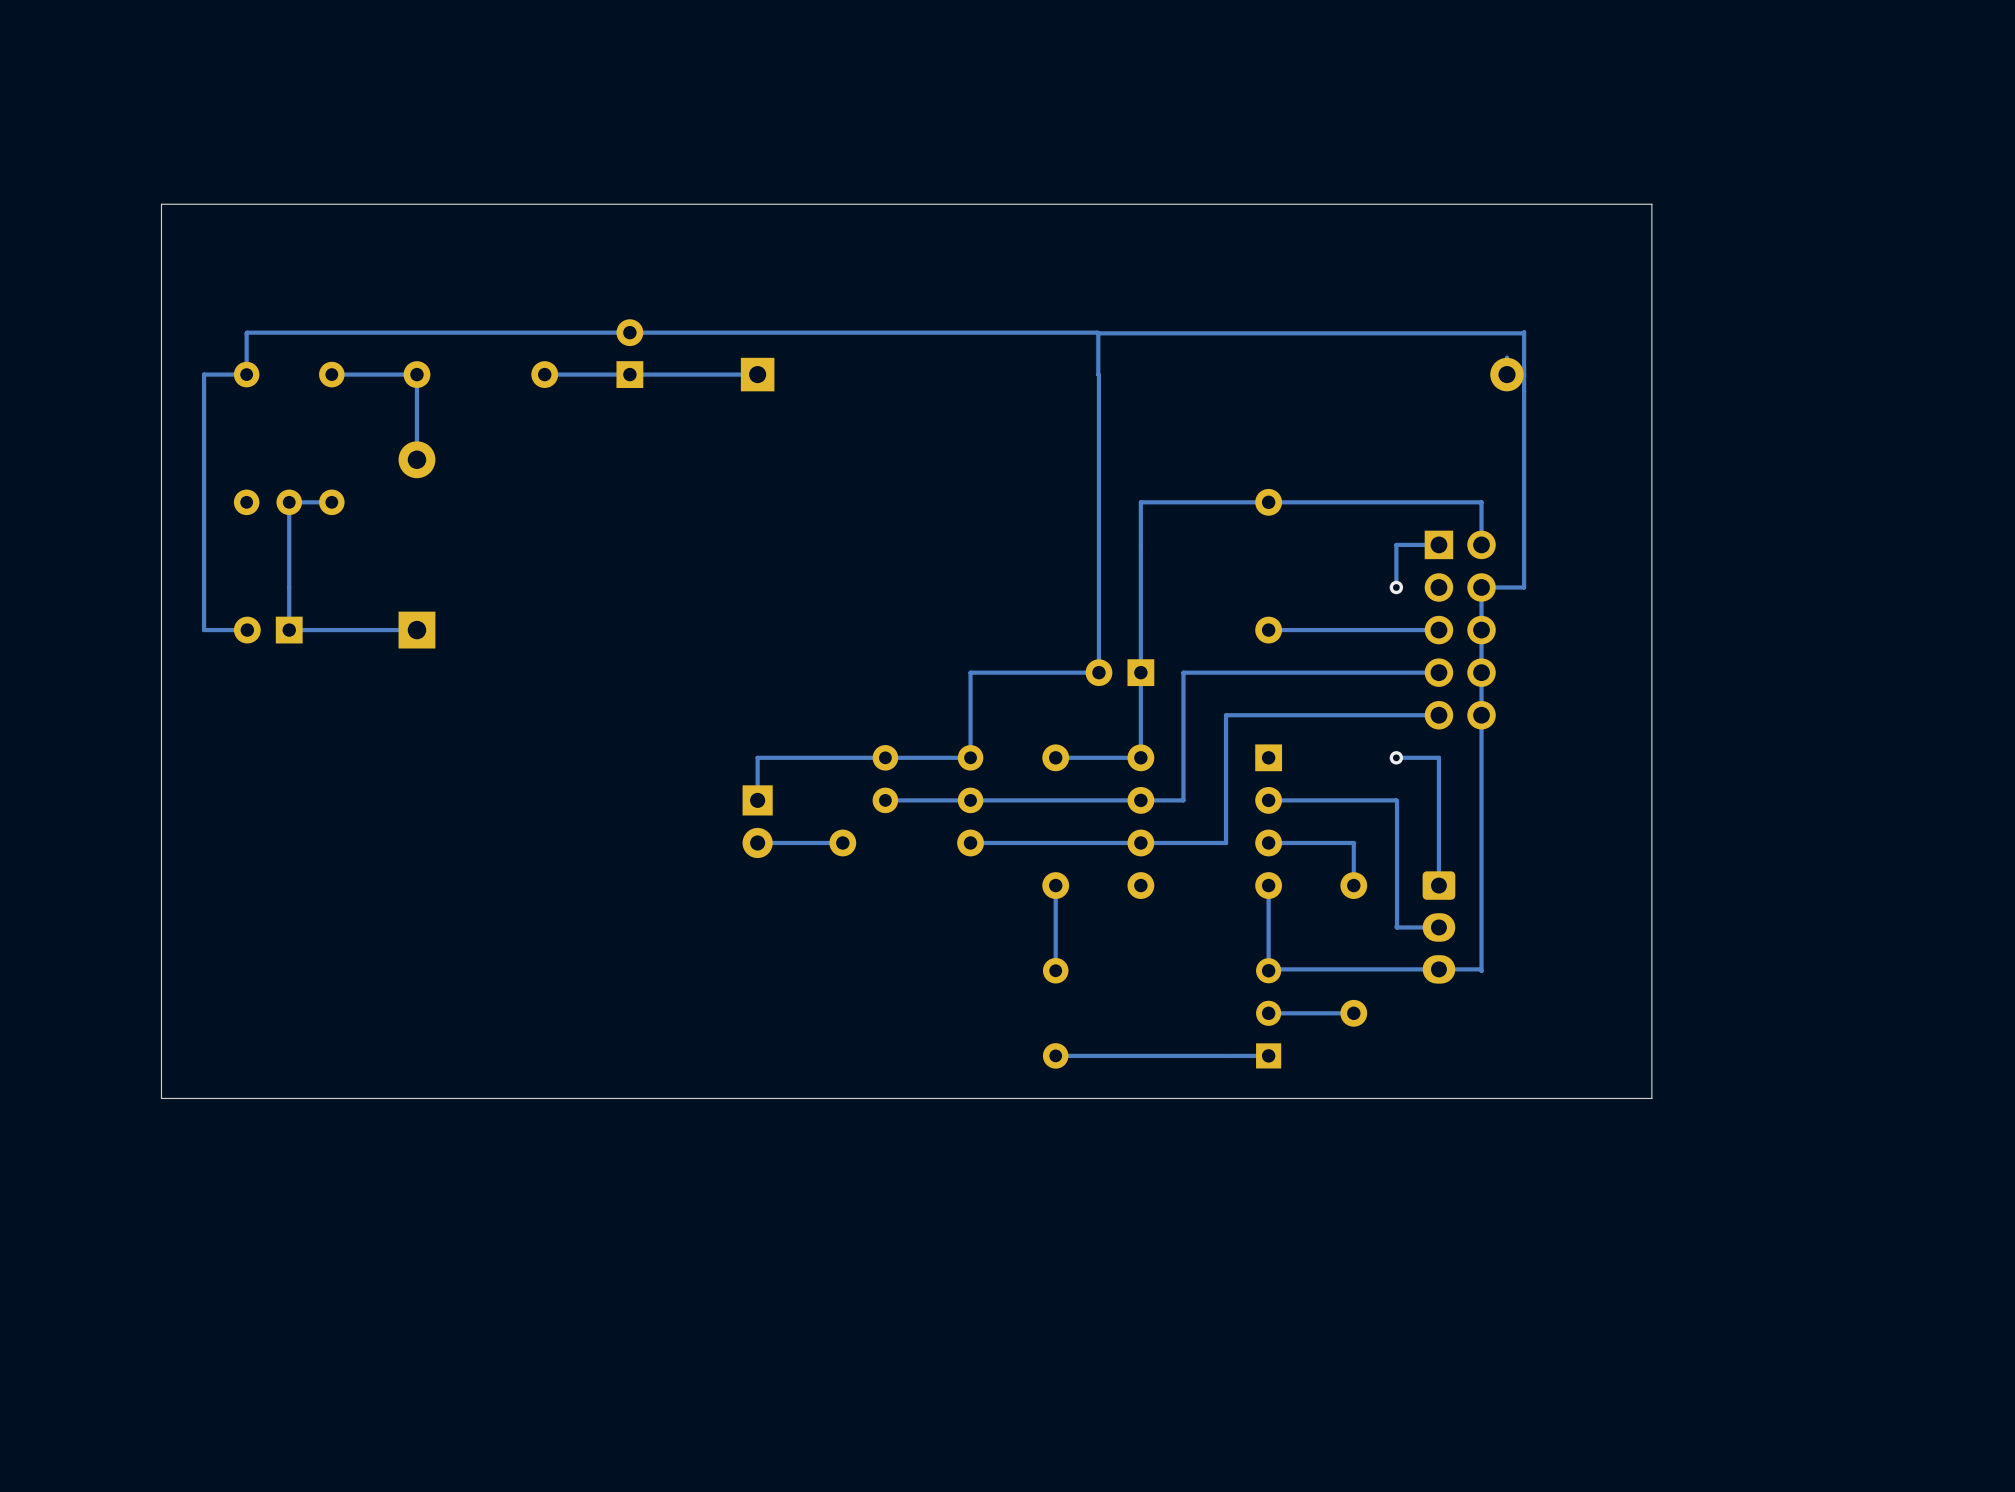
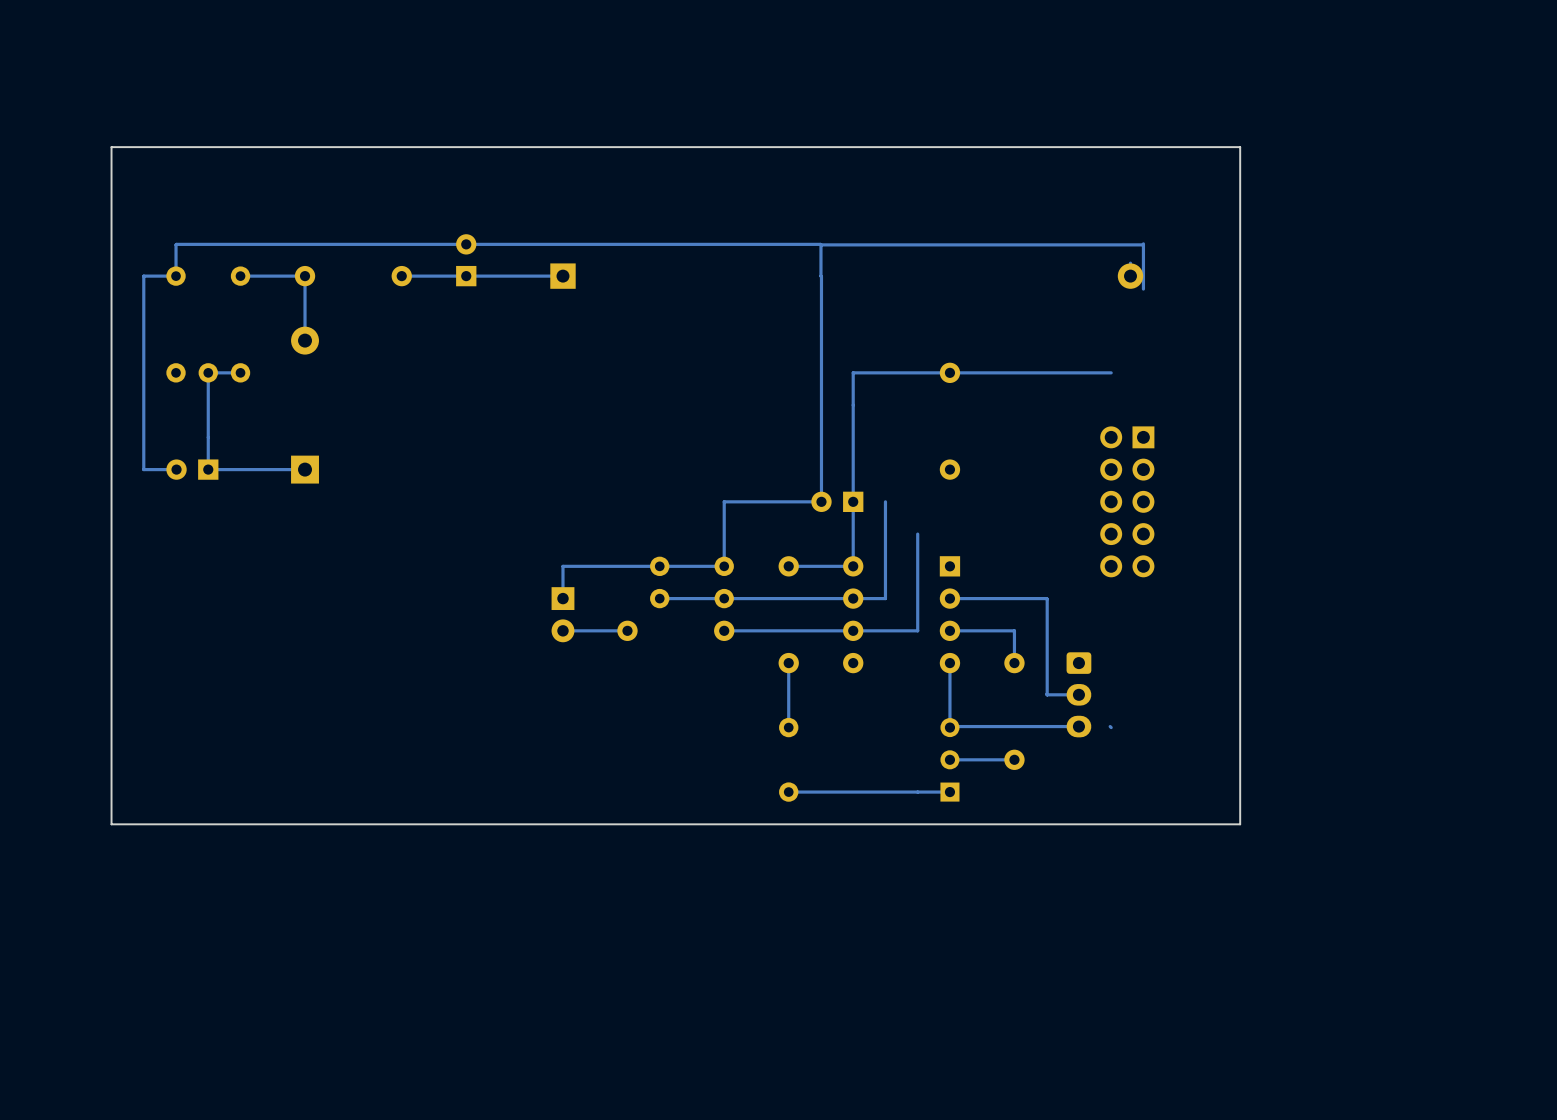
track: (1524, 391) (1524, 587) (1481, 587) (1481, 970) -> none
track: (1481, 502) (1481, 544) -> none
track: (1438, 544) (1396, 544) (1396, 587) -> none
via: (1396, 587) -> none
track: (1438, 630) (1268, 630) -> none
part: (1460, 630) -> none
track: (1438, 672) (1183, 672) -> none
part: none -> (1127, 501)
track: (1438, 715) (1226, 715) -> none
track: (1396, 757) (1438, 757) (1438, 885) -> none
via: (1396, 757) -> none
track: (1480, 969) (1438, 969) -> none

